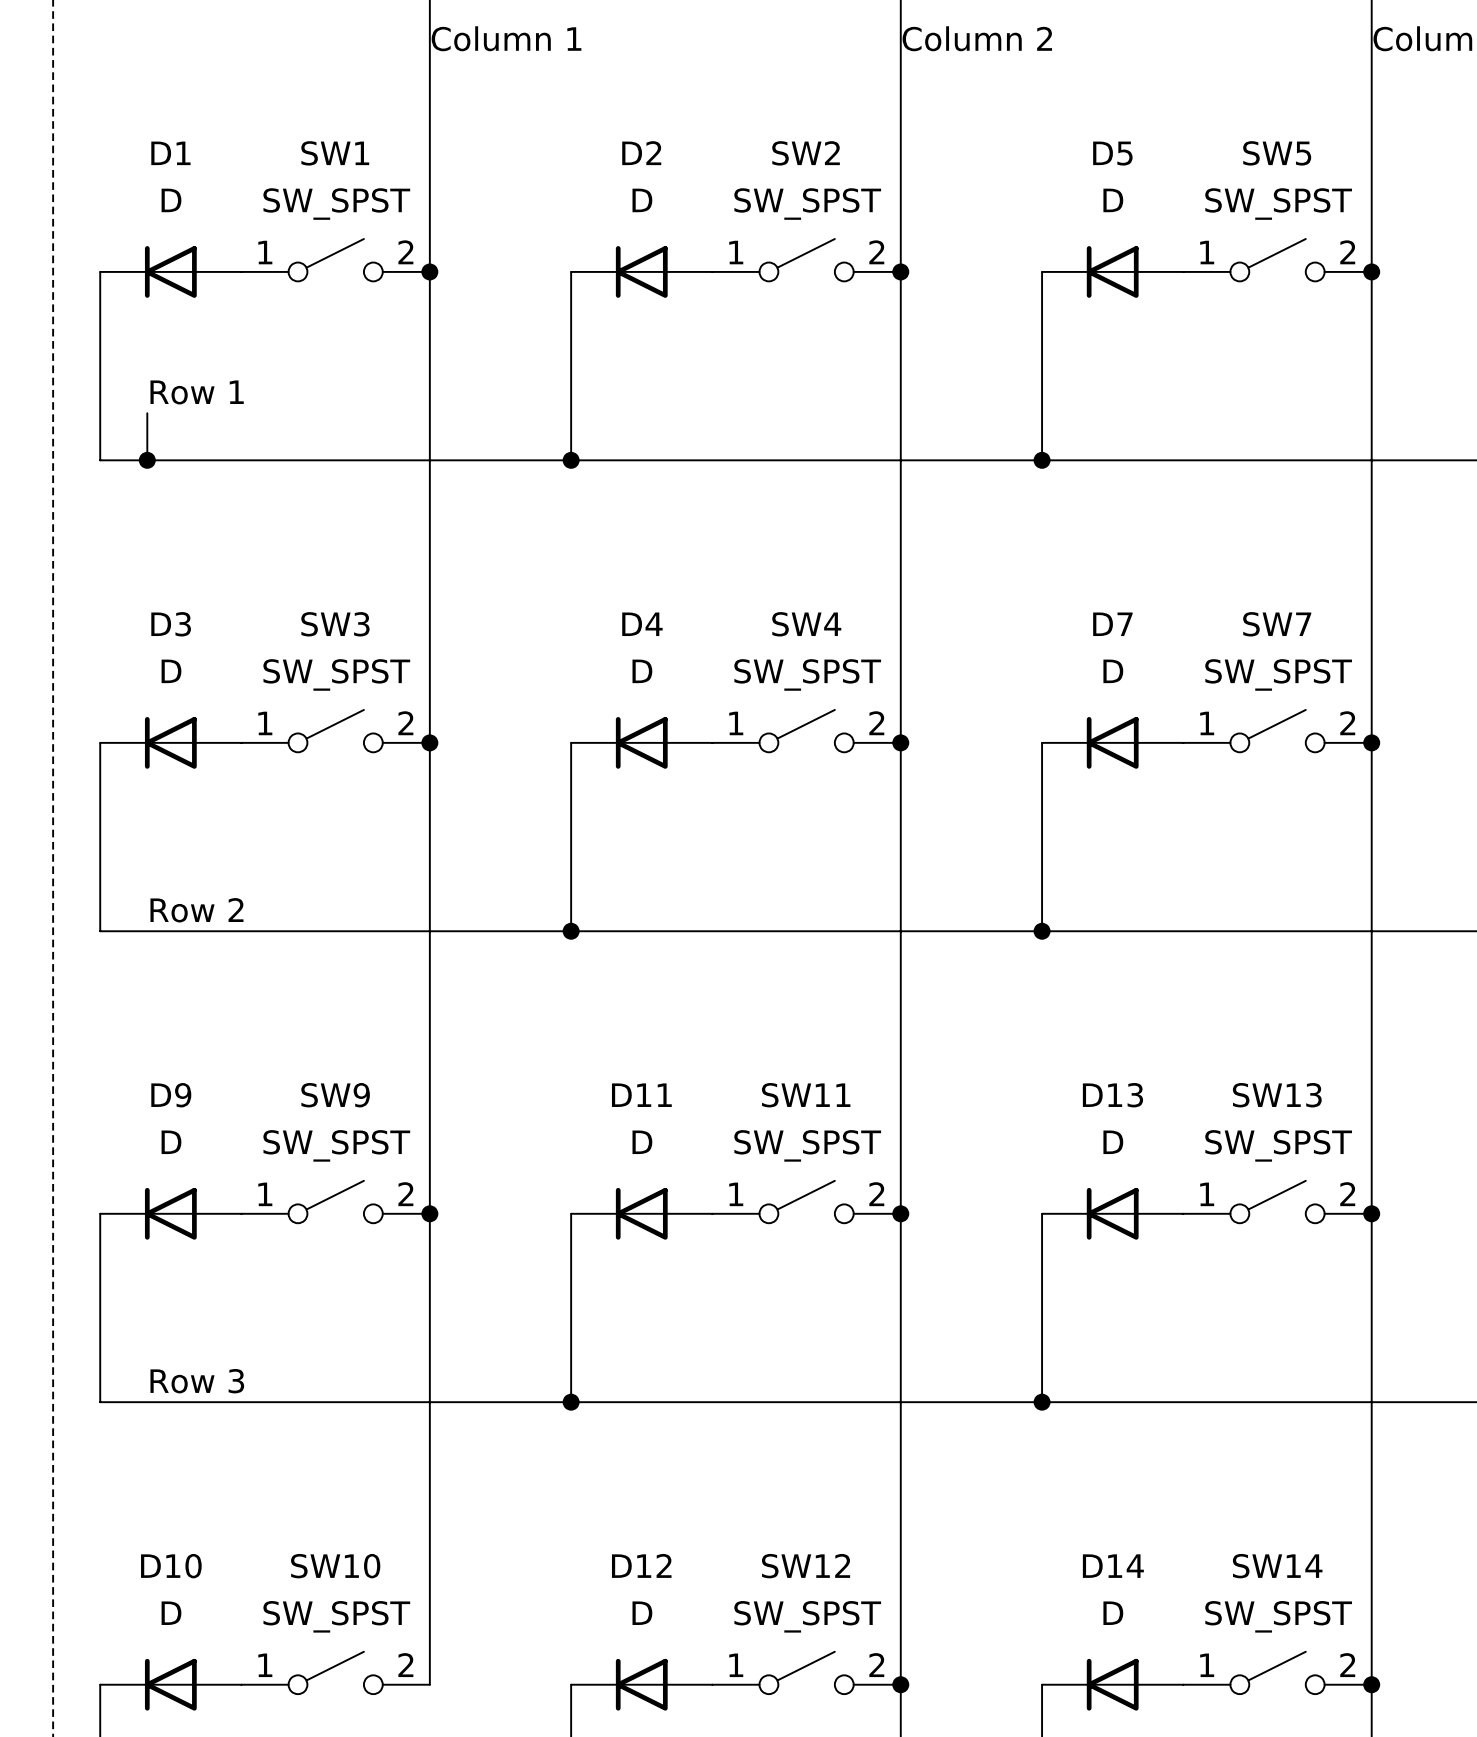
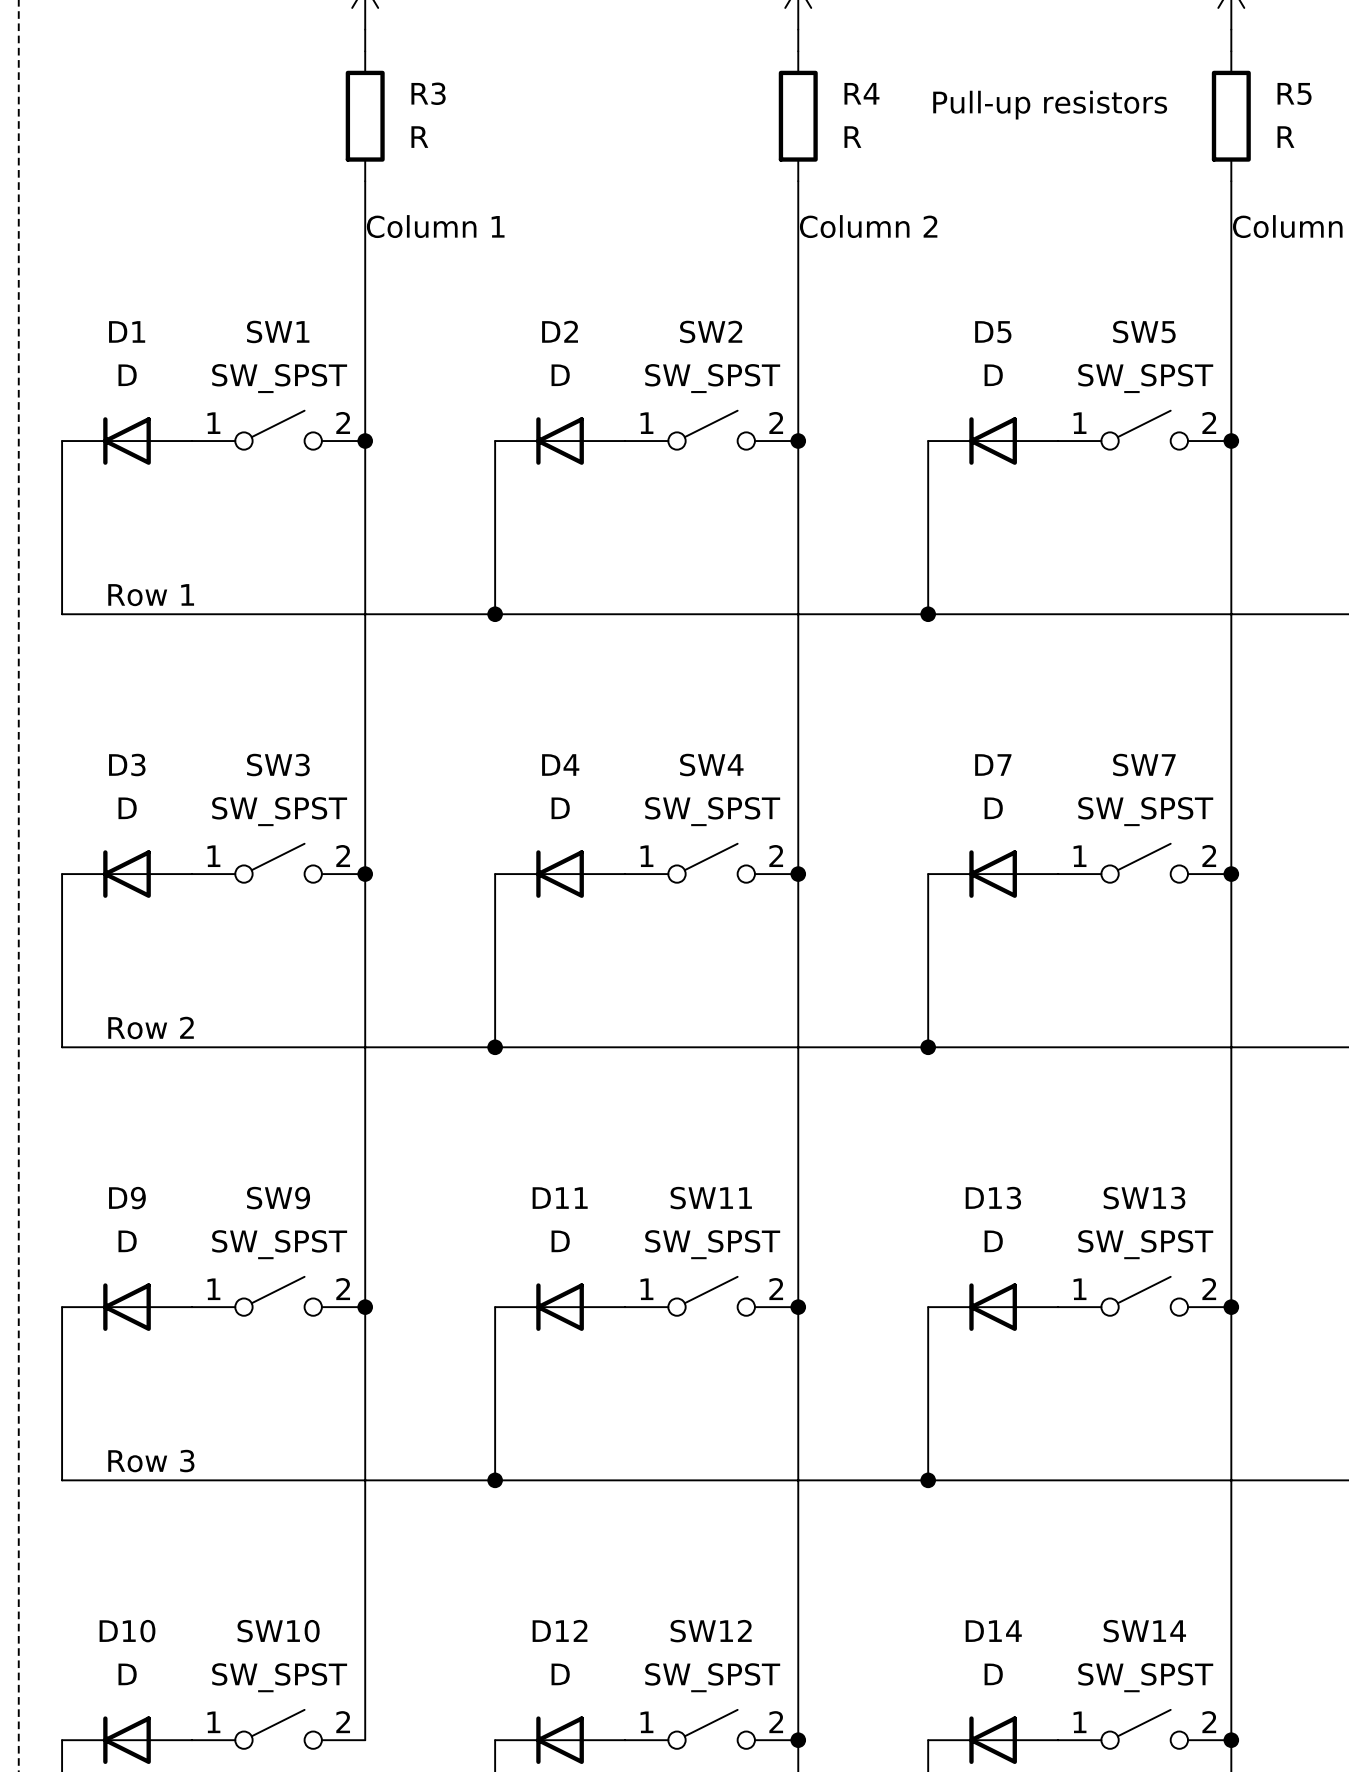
label position: Row 1 (197, 392) -> Row 1 (151, 595)
wire: (147, 413) (147, 460) -> none
junction: (147, 460) -> none

